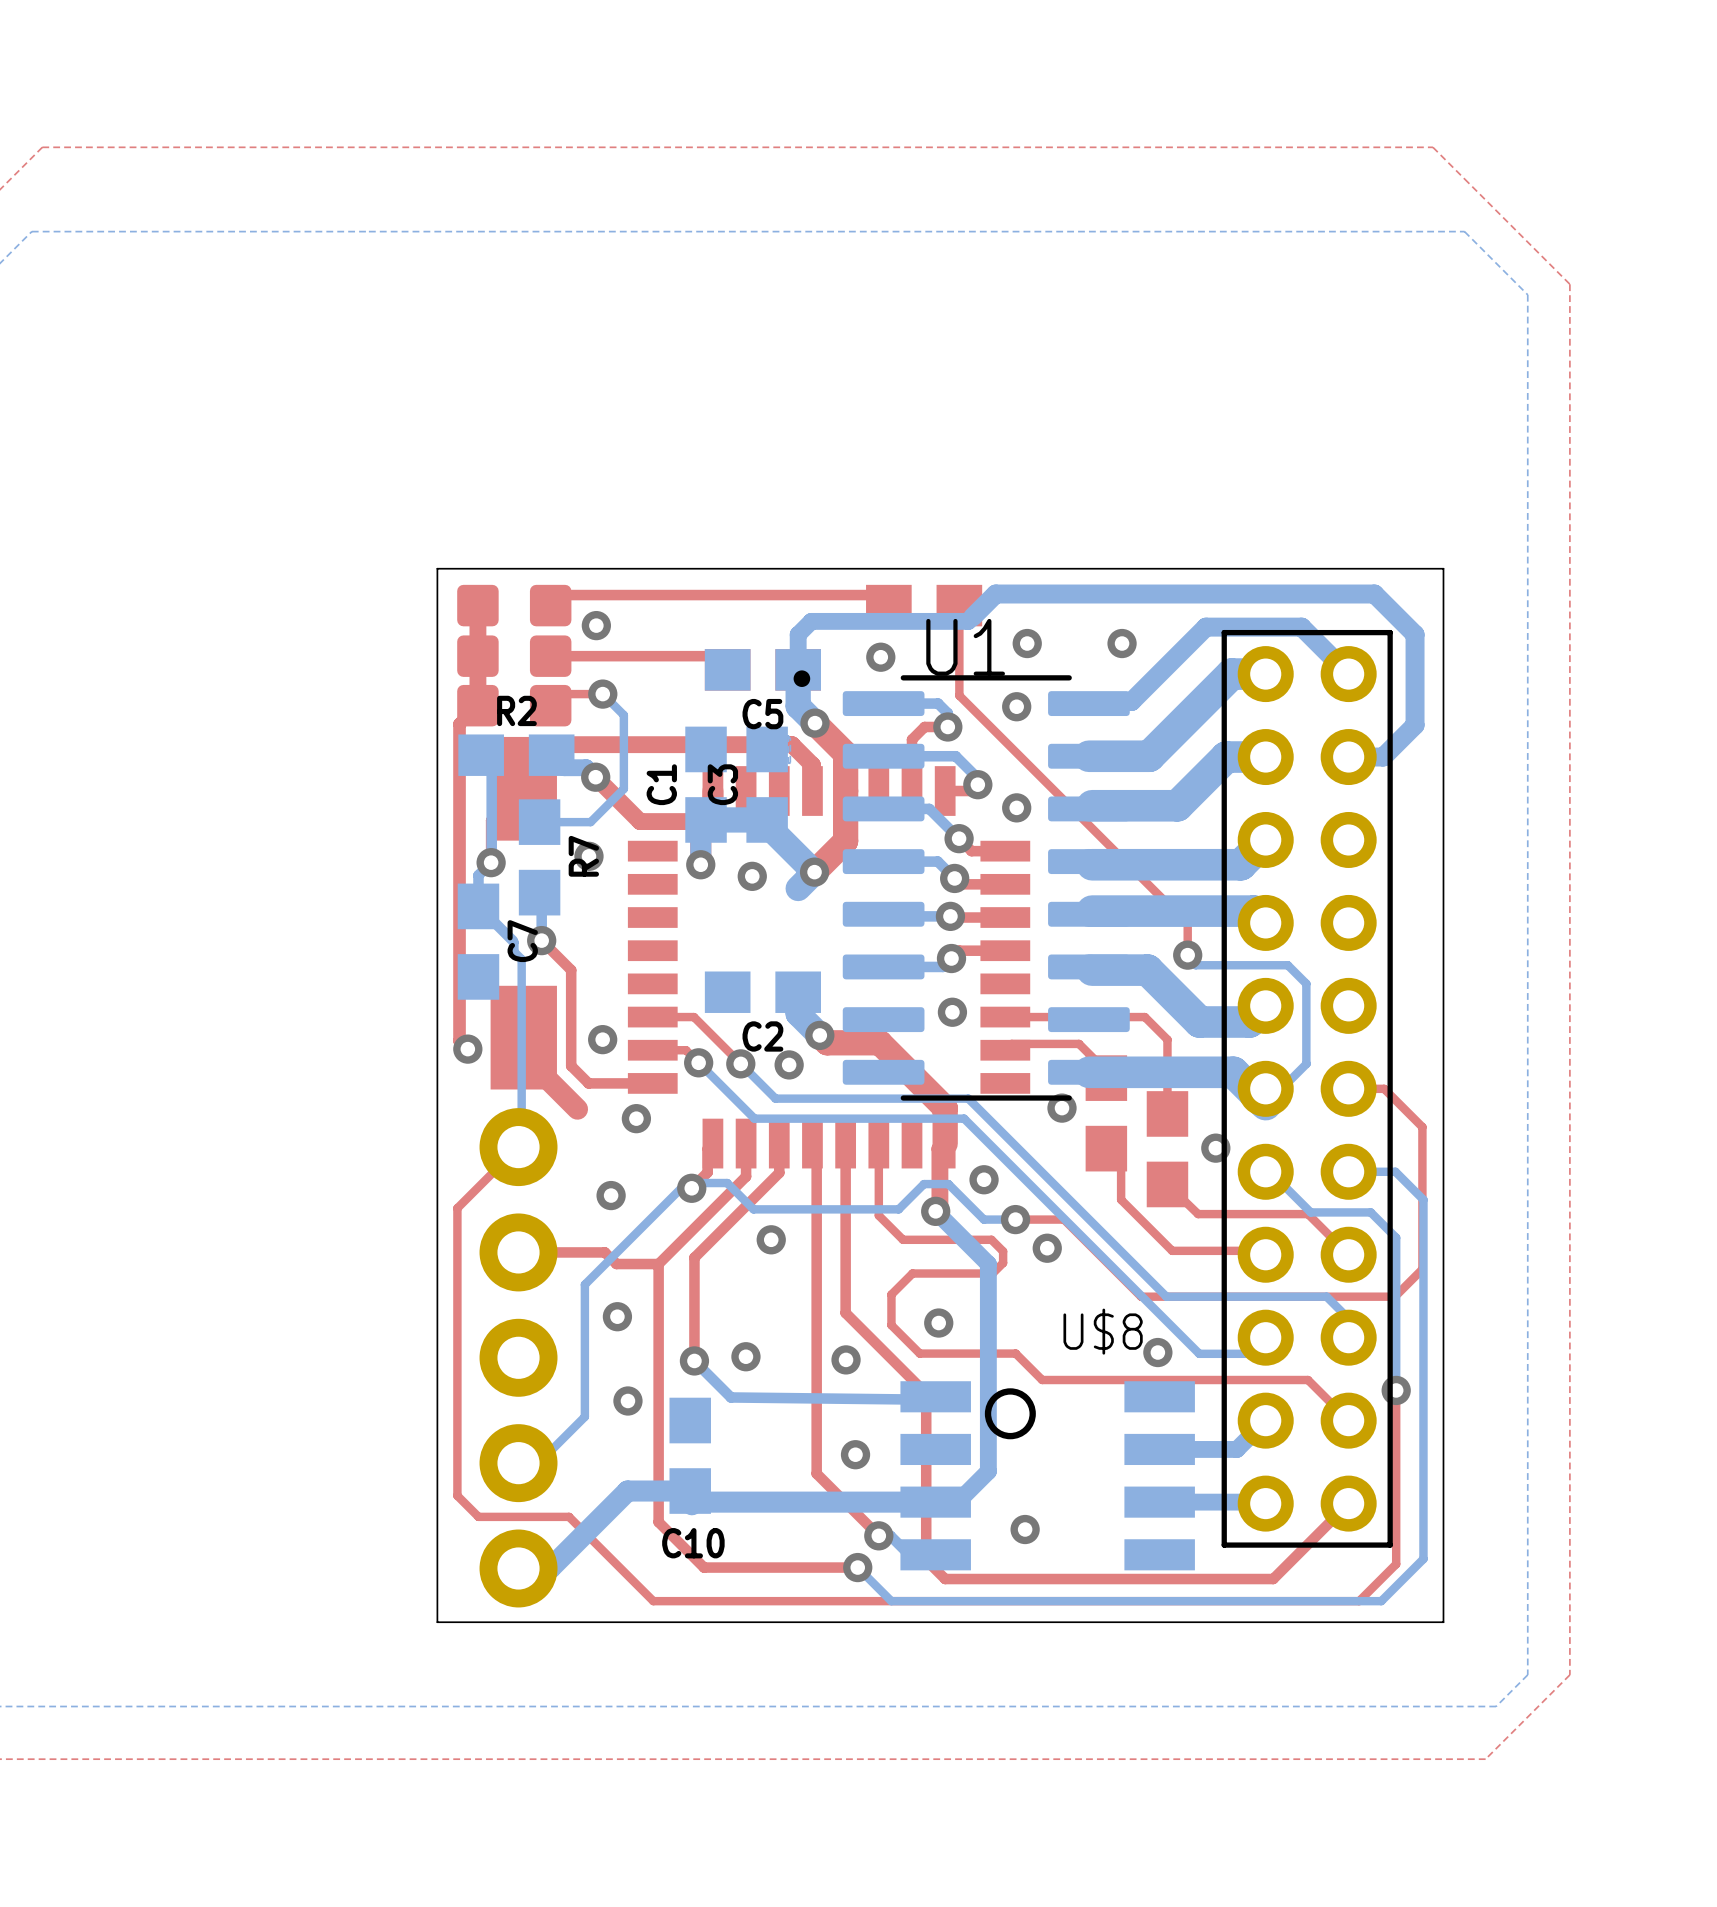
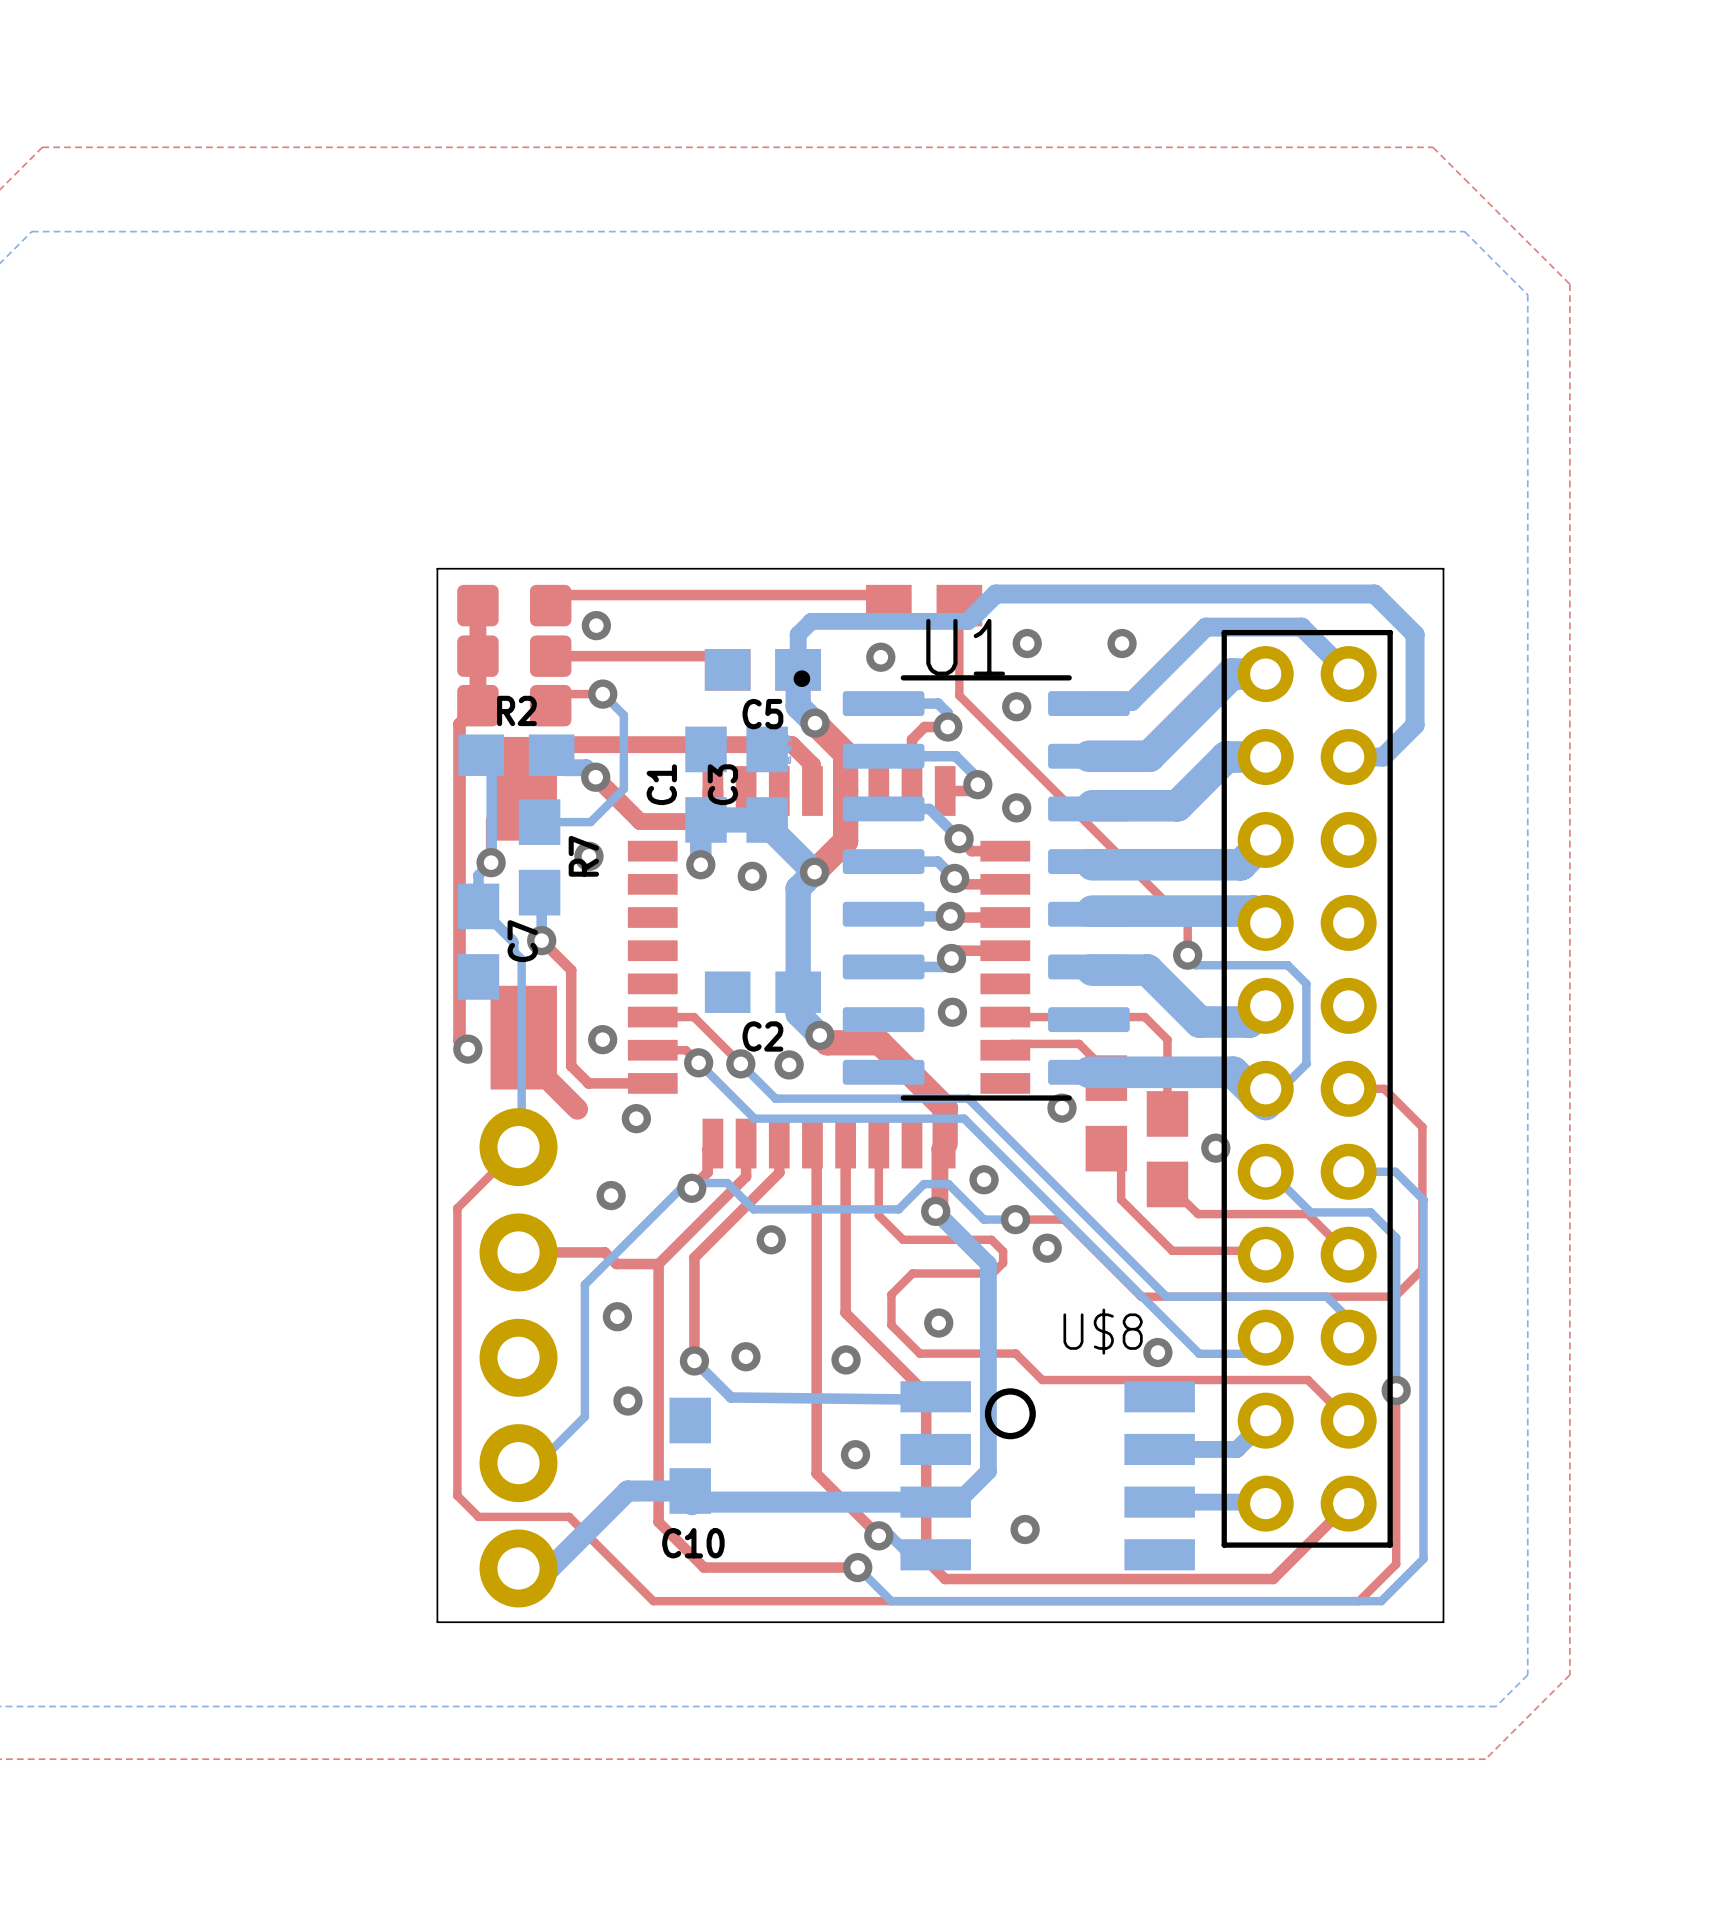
bottom track: none -> (798, 888) (798, 992)

